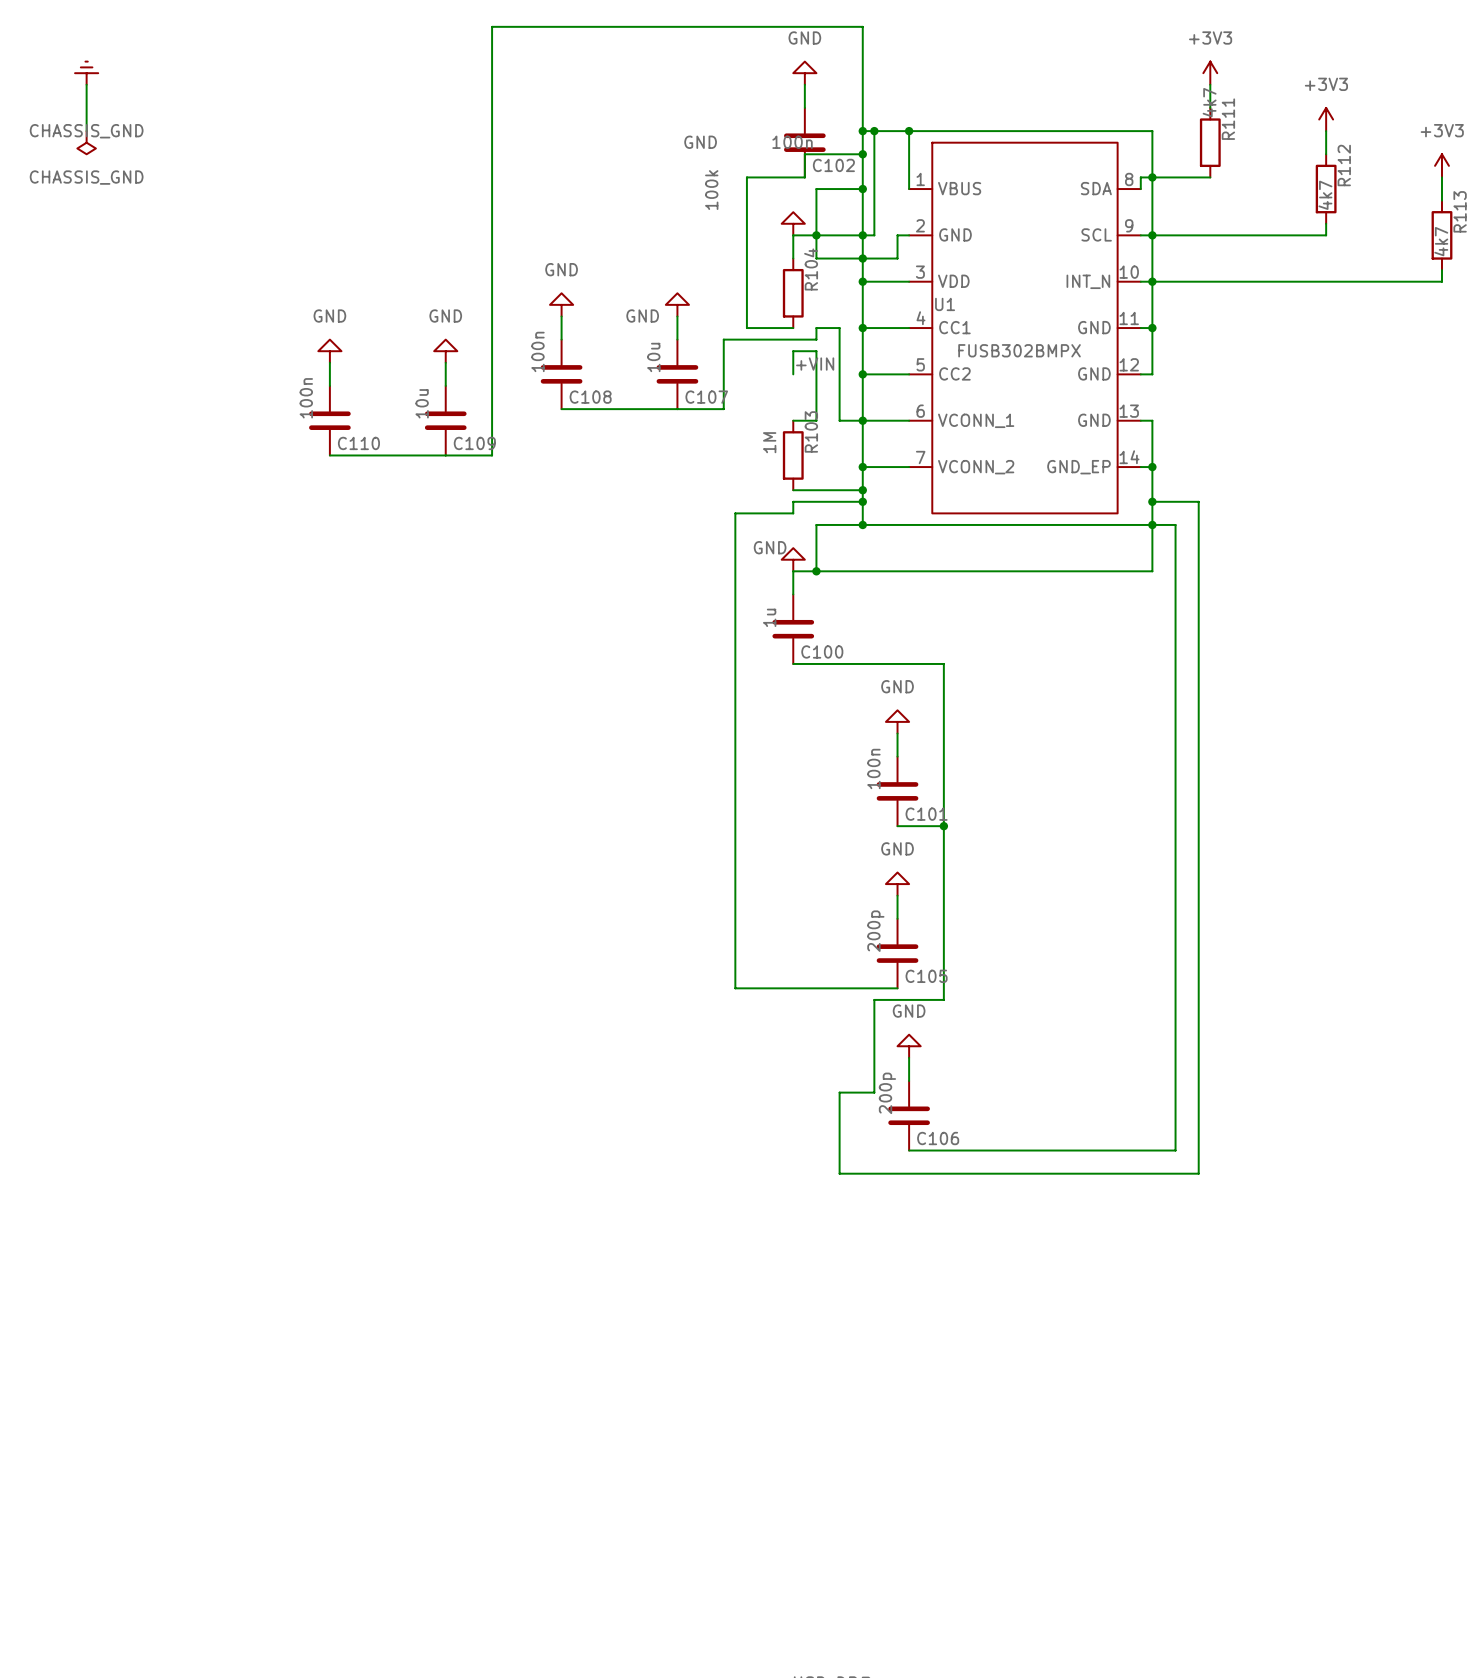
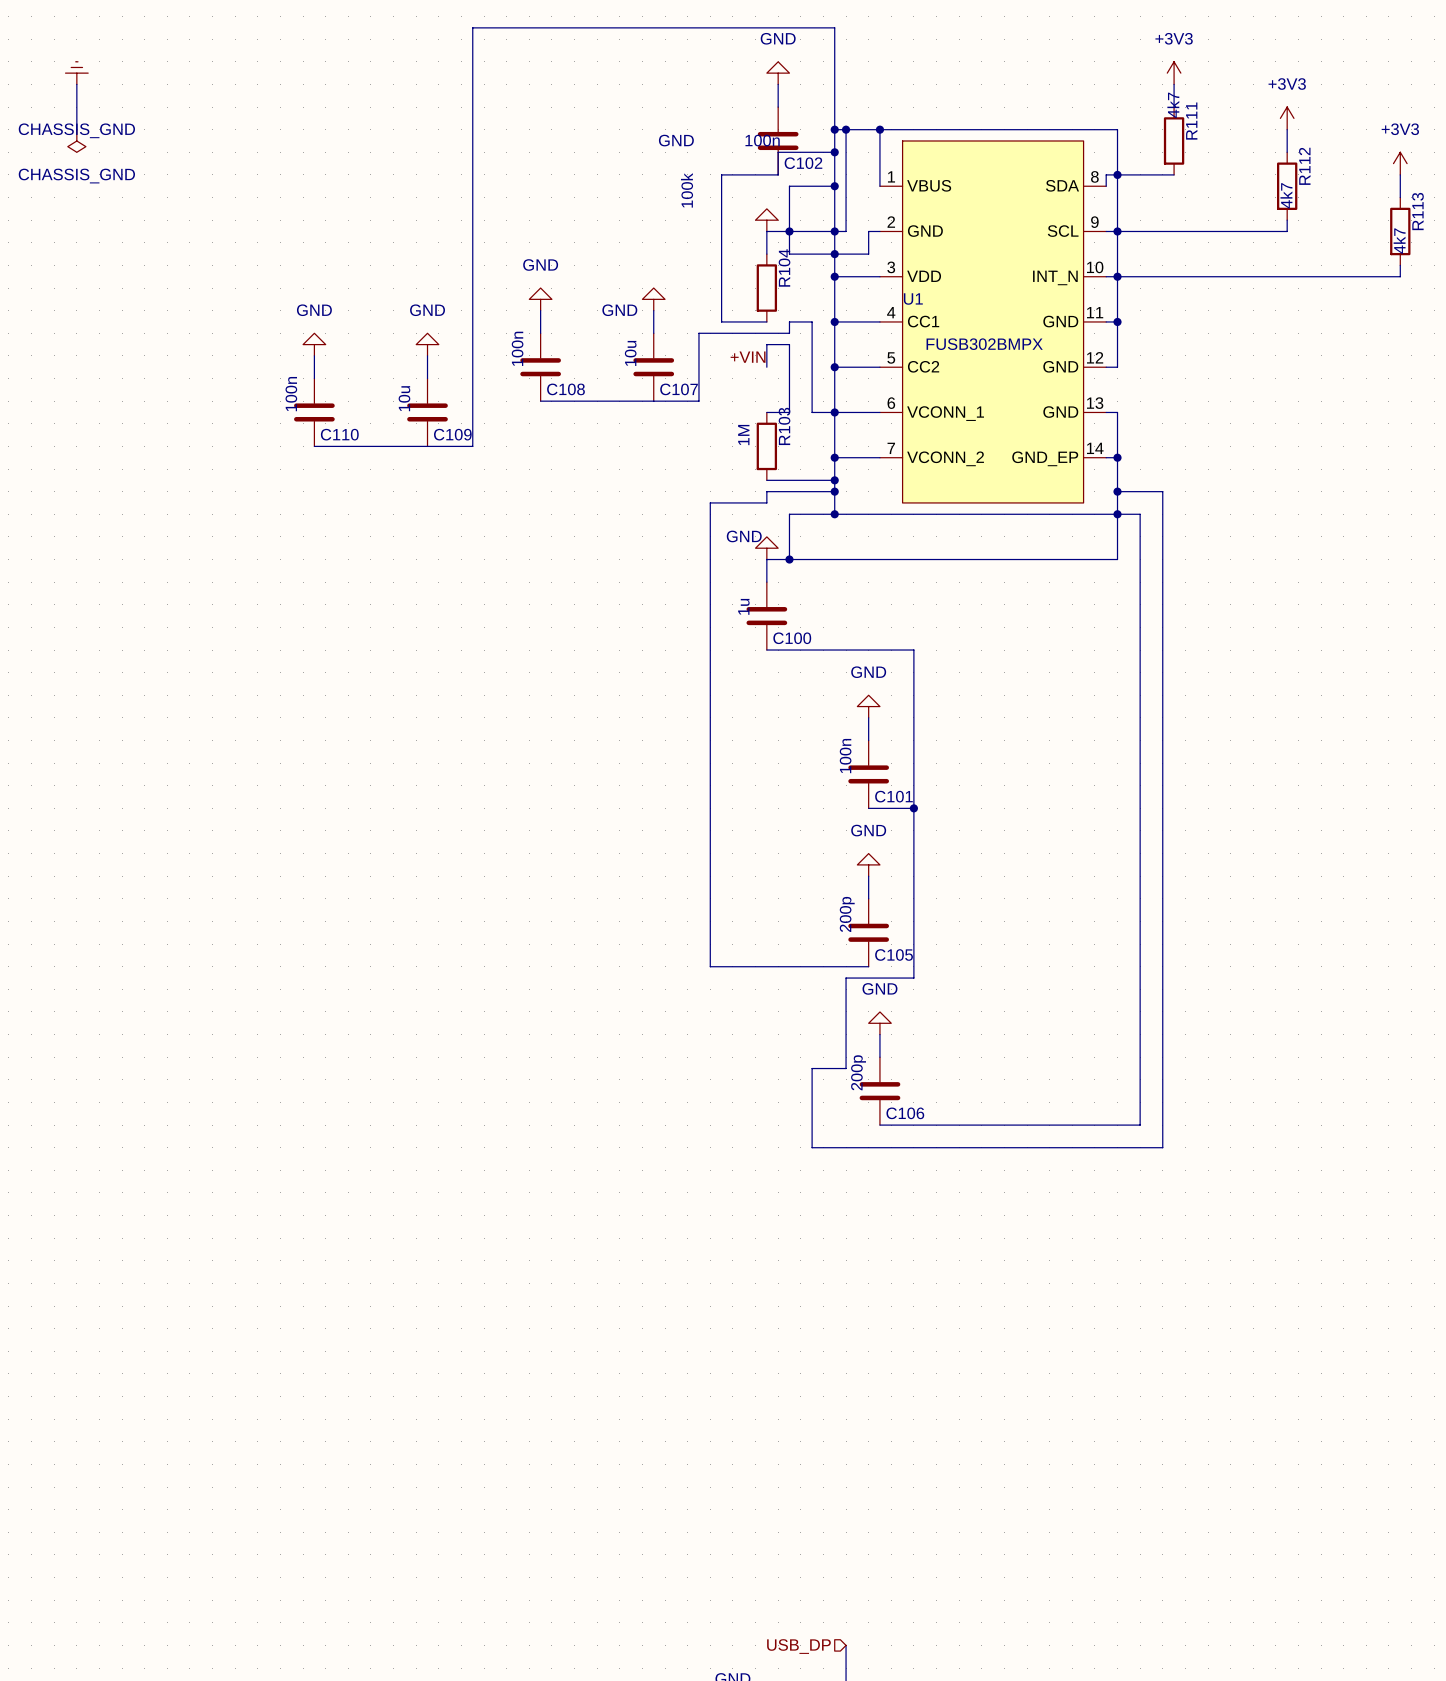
label position: +VIN (815, 364) -> +VIN (748, 357)

